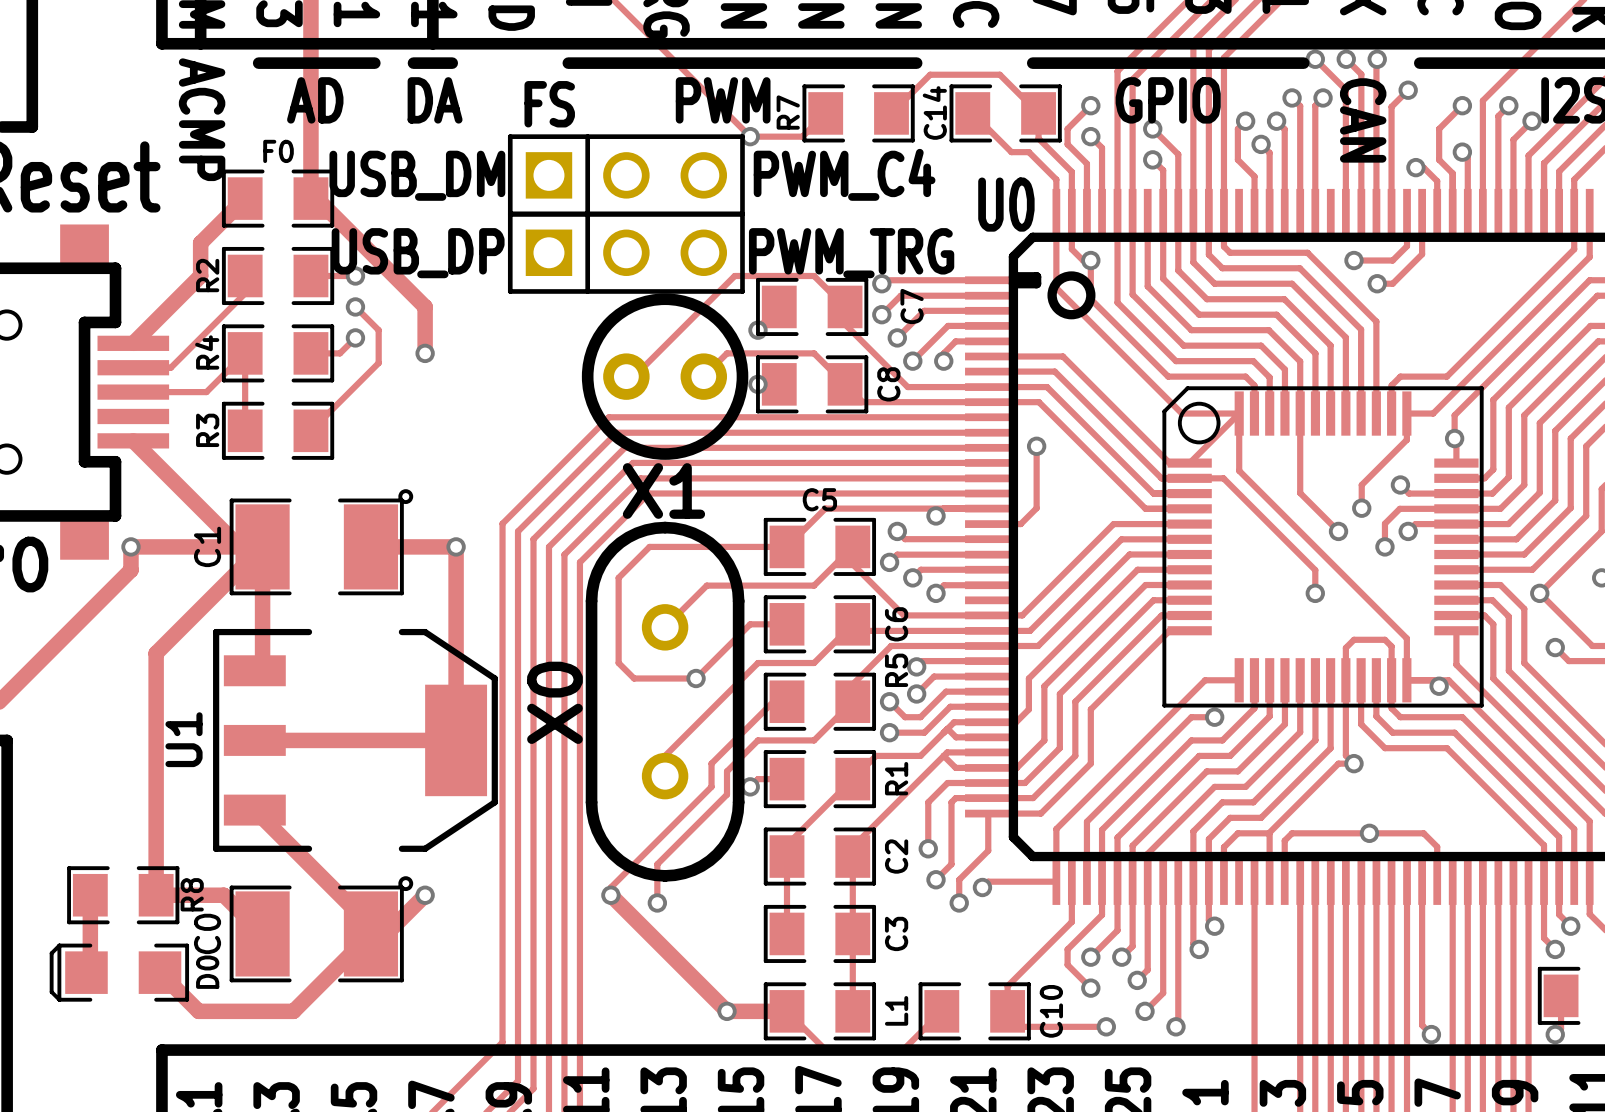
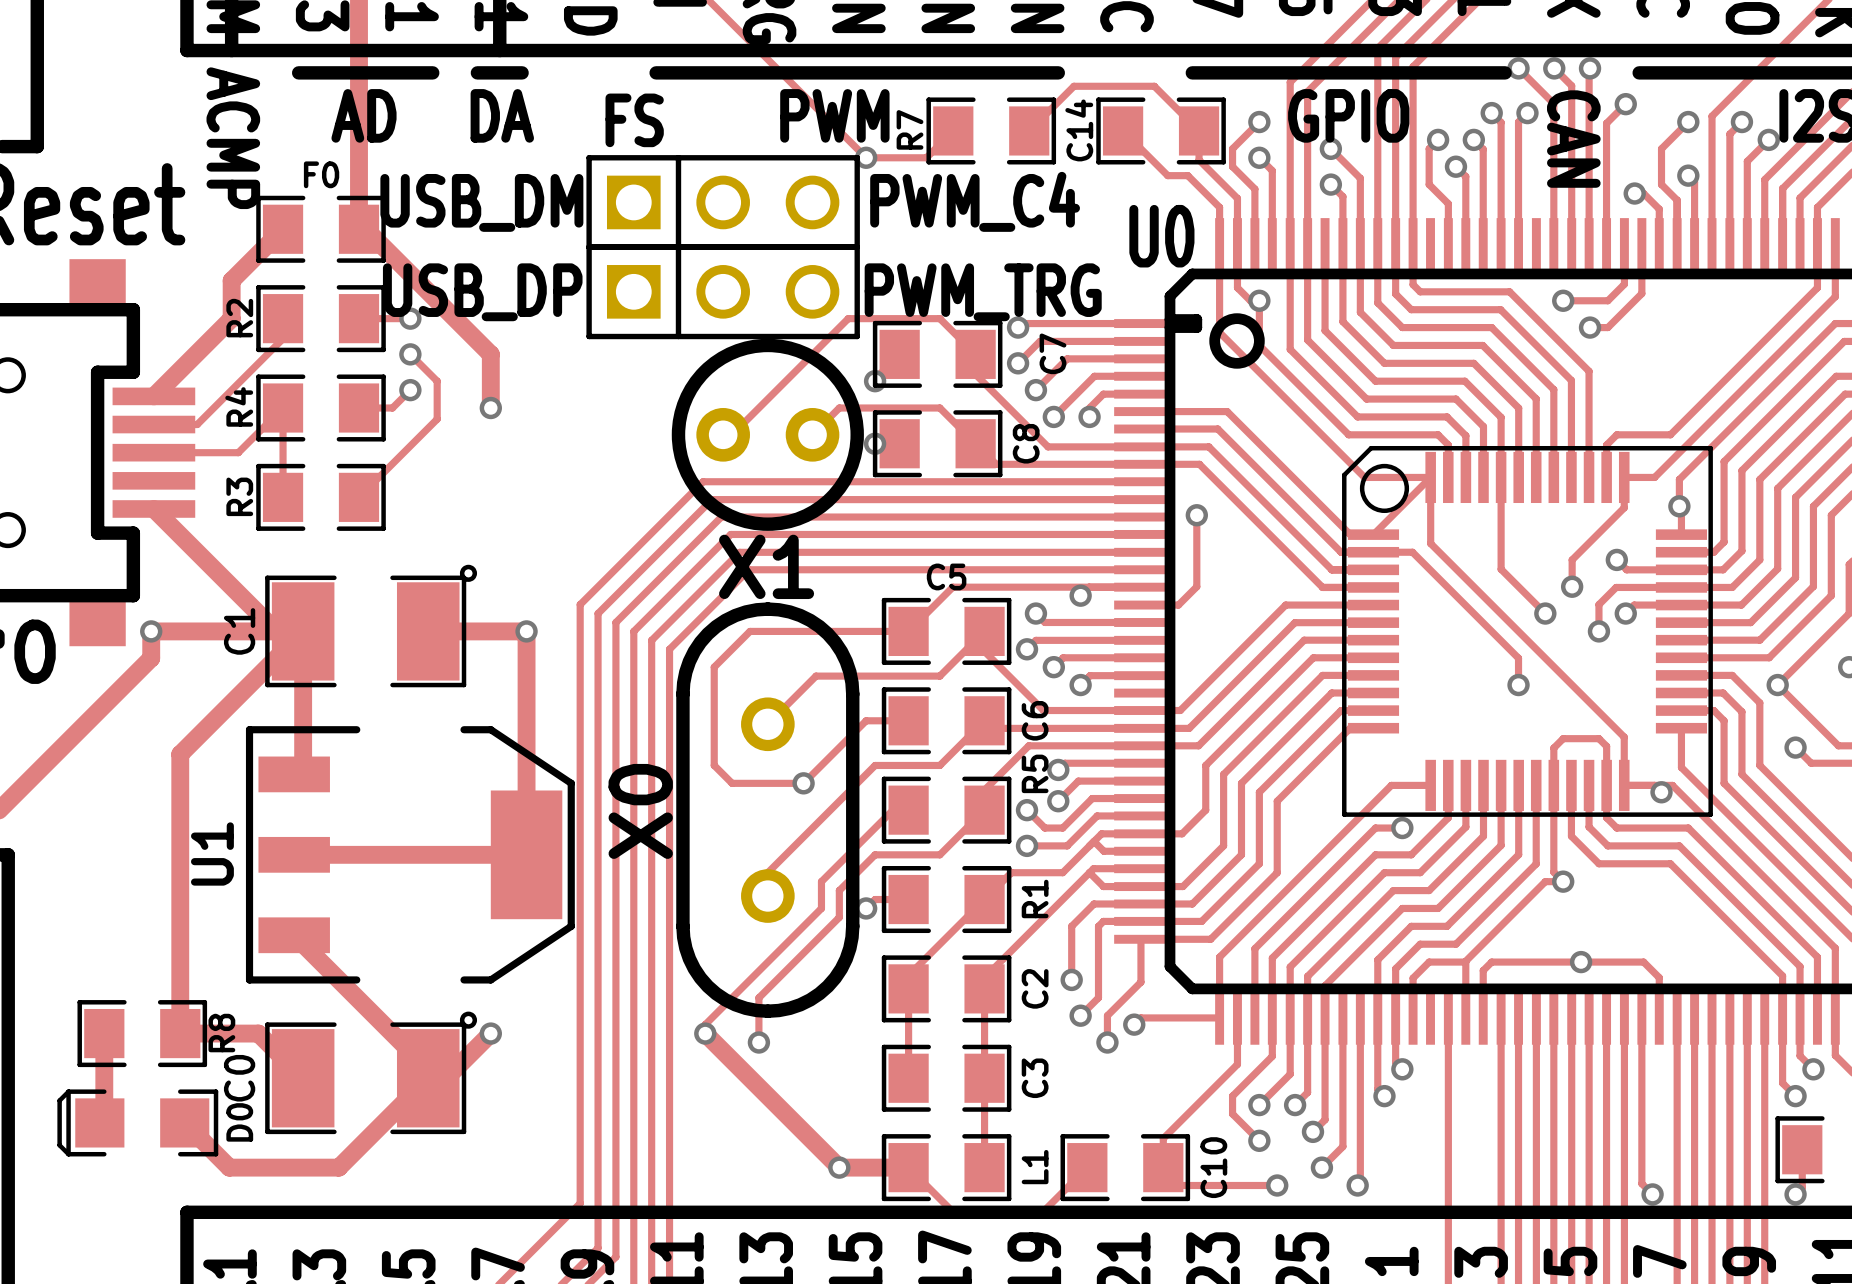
track: (1044, 663) (1028, 678) (1028, 709) (1016, 722) -> (1205, 810) (1182, 833) (1173, 833)
track: (1059, 670) (1044, 686) -> (1205, 765) (1205, 792)
track: (1075, 678) (1059, 693) -> (1223, 774) (1223, 801)
track: (1090, 686) (1075, 701) -> (1241, 783) (1241, 810)
track: (1106, 693) (1090, 709) -> (1259, 792) (1259, 819)
track: none -> (1277, 801) (1277, 872) (1210, 939) (1201, 939)
track: (1044, 701) (1044, 740) (1016, 767) -> none
track: (1059, 732) (1059, 748) (1025, 783) -> (1223, 845) (1182, 886) (1174, 886)
track: (1075, 740) (1075, 755) (1033, 798) -> (1241, 854) (1192, 903) (1183, 903)
track: (1090, 748) (1090, 763) (1040, 813) -> (1259, 863) (1201, 921) (1192, 921)

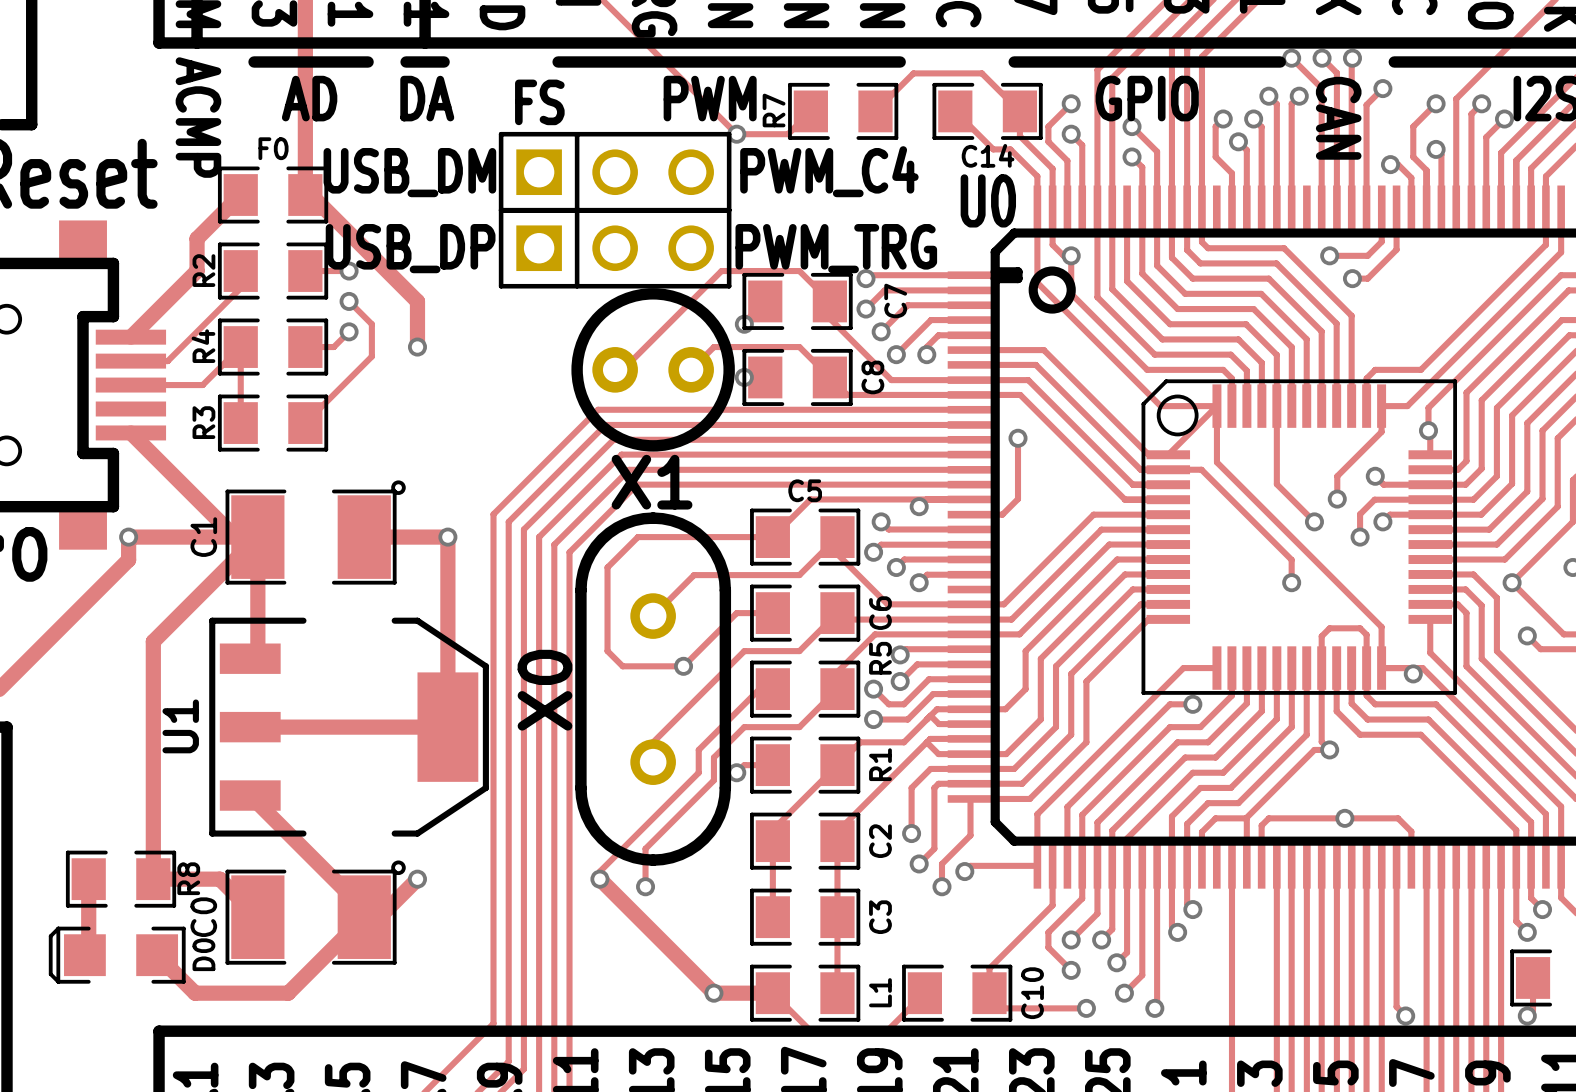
C14 name rotation: 0° (1079, 130) -> 90° clockwise (988, 155)
C14 name position: C14 (1079, 130) -> C14 (988, 155)

